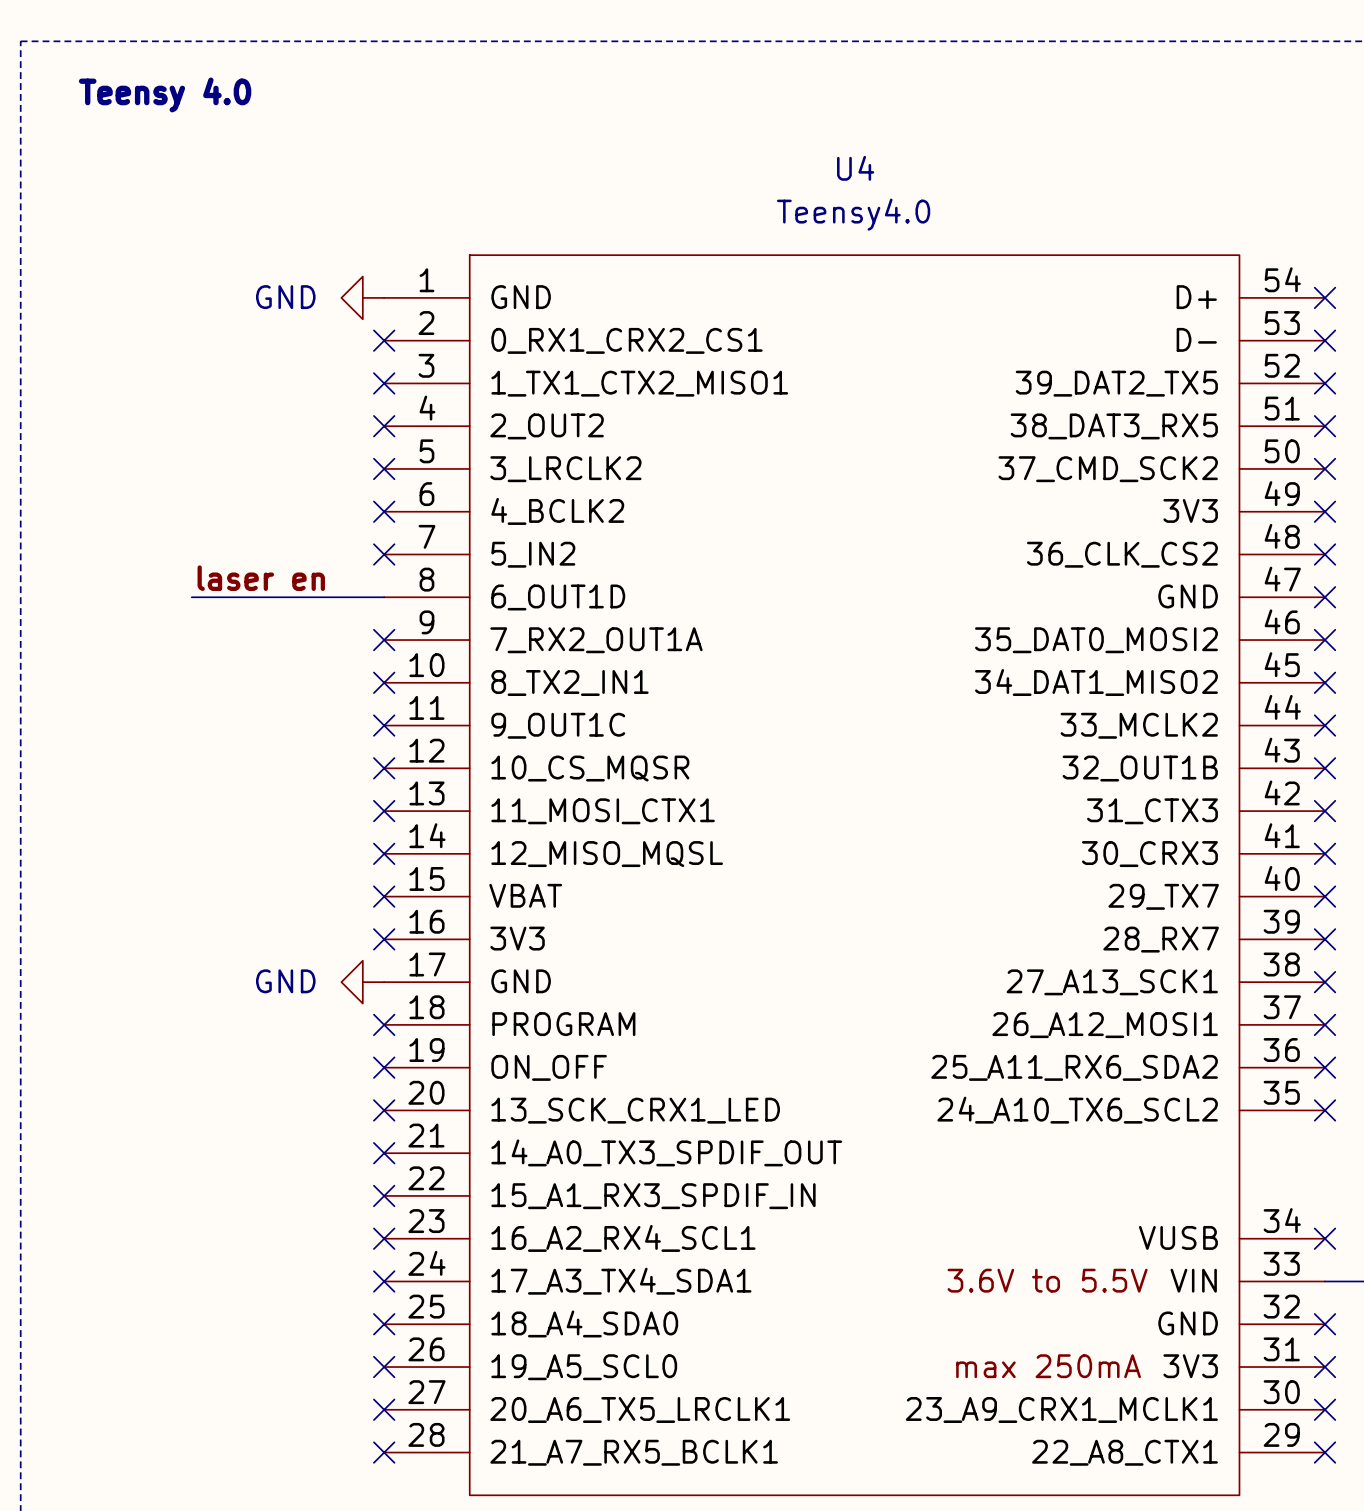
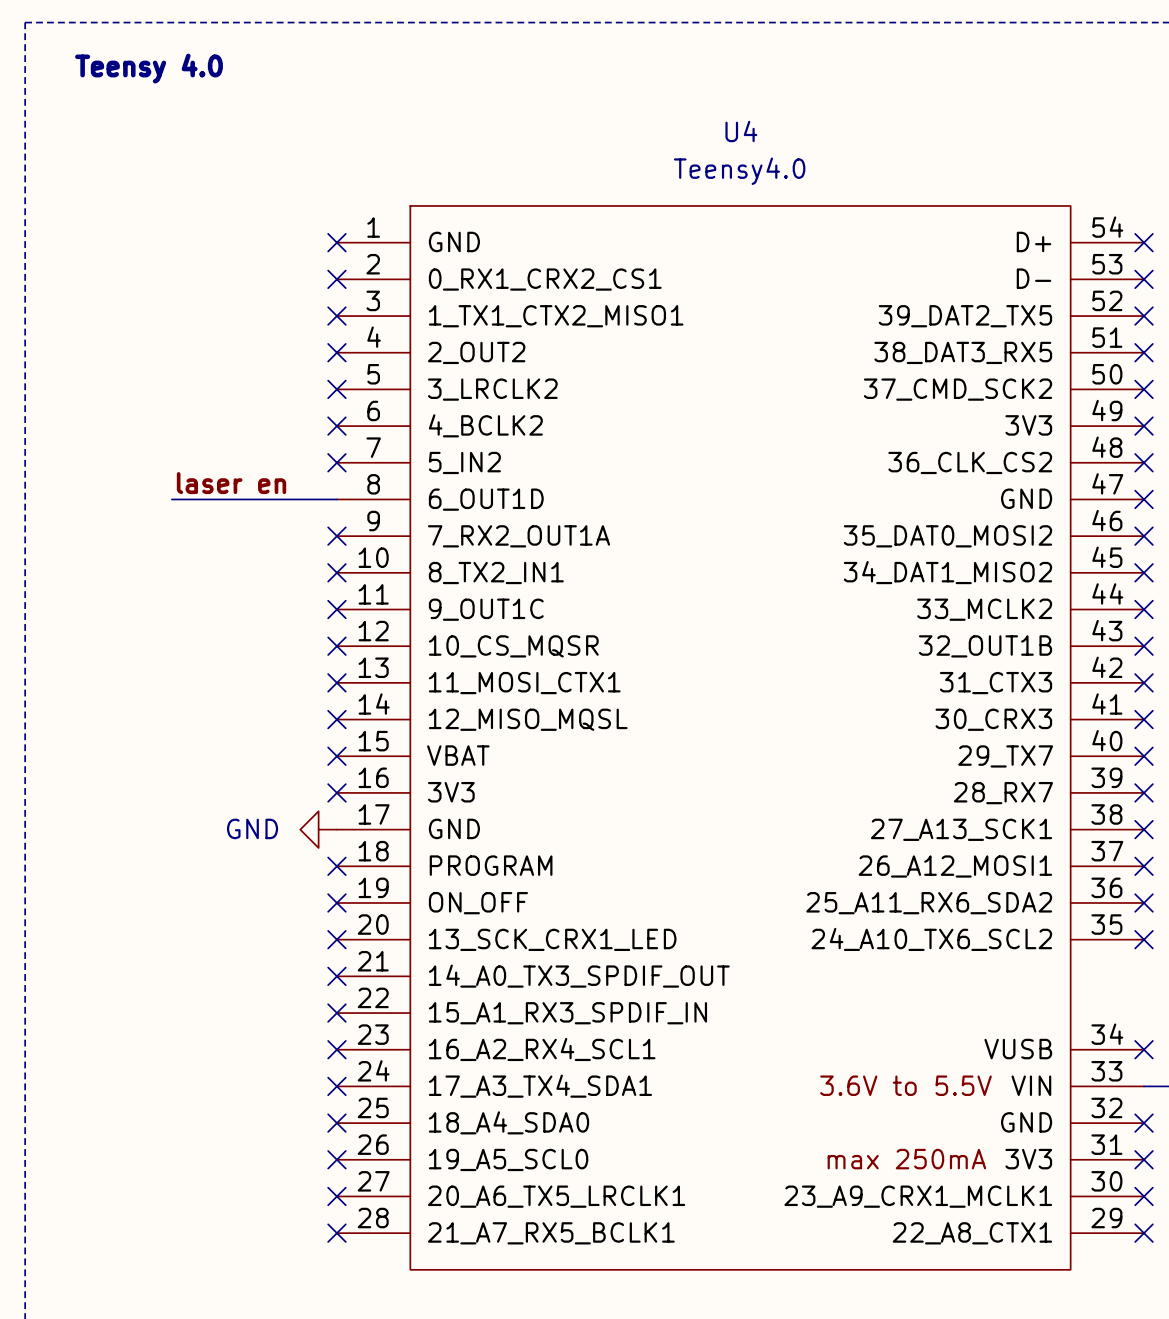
power symbol: GND (362, 297) -> none
no-connect mark: none -> (336, 242)

